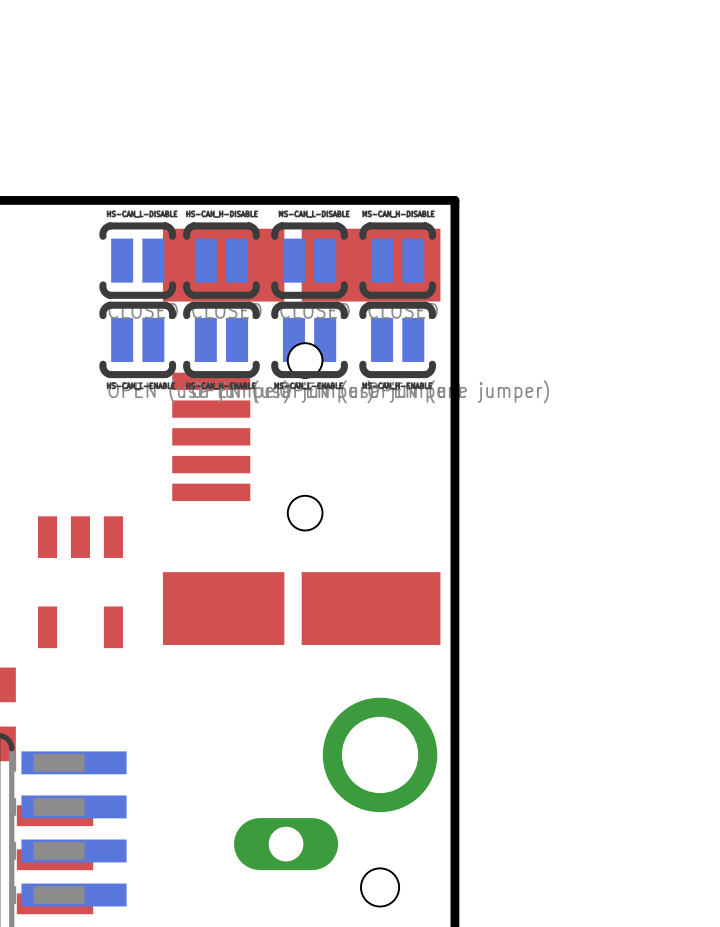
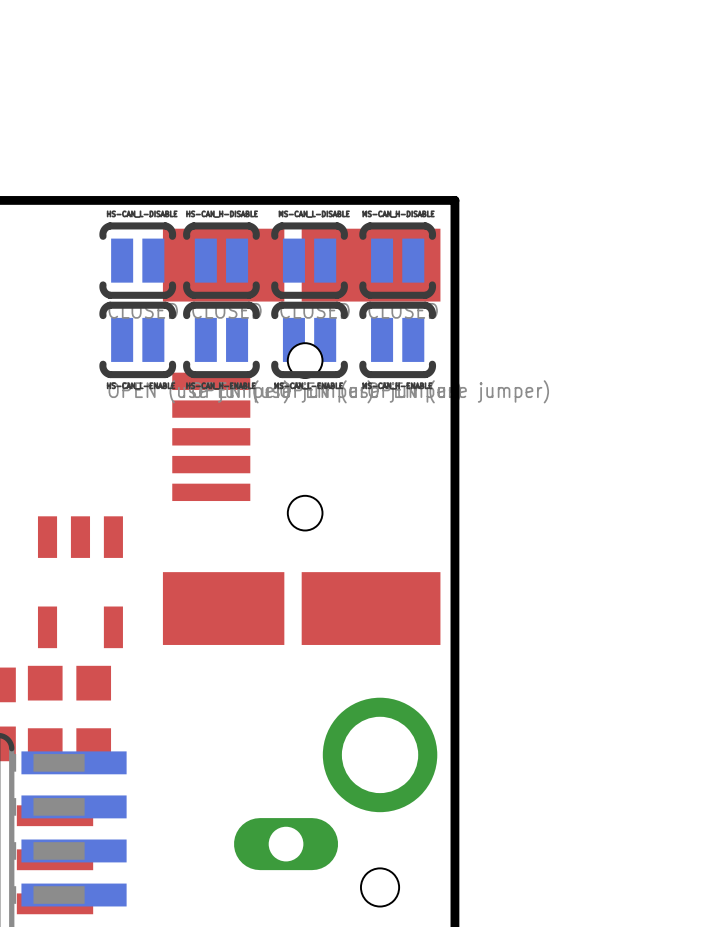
part: none -> (45, 714)
part: none -> (93, 714)

